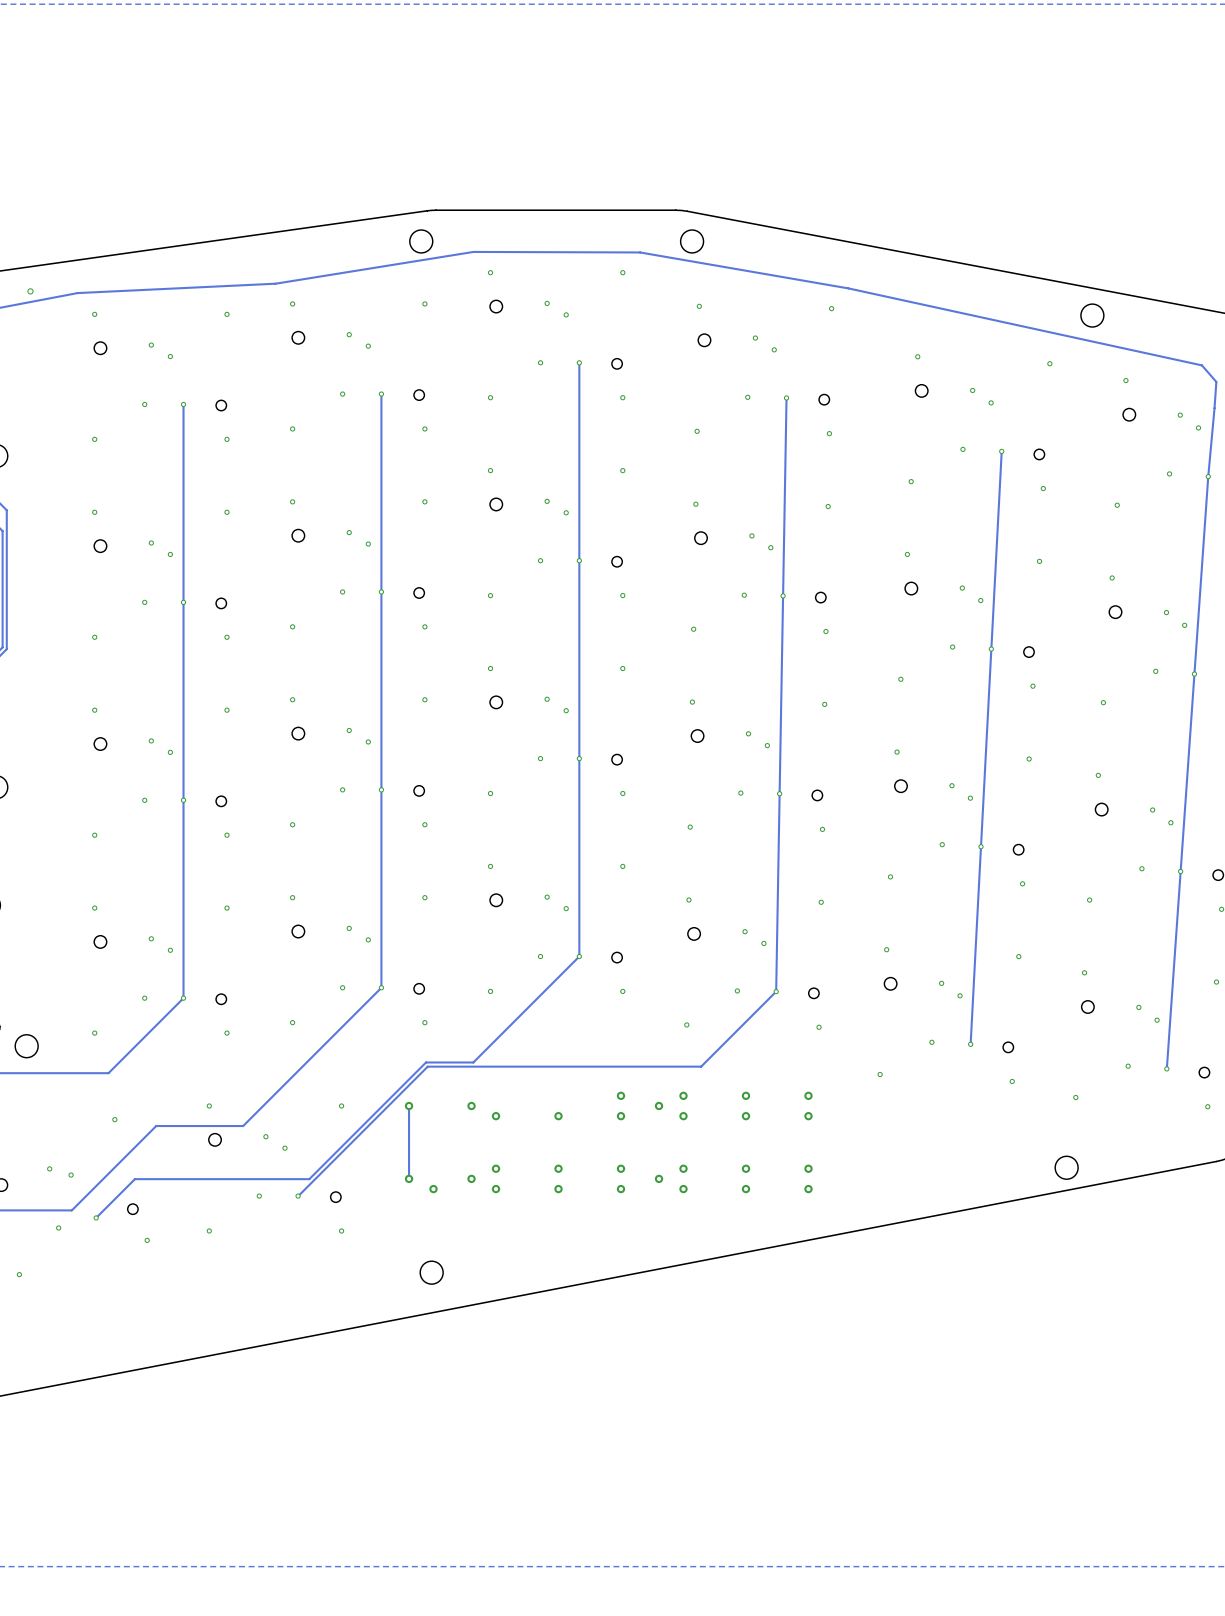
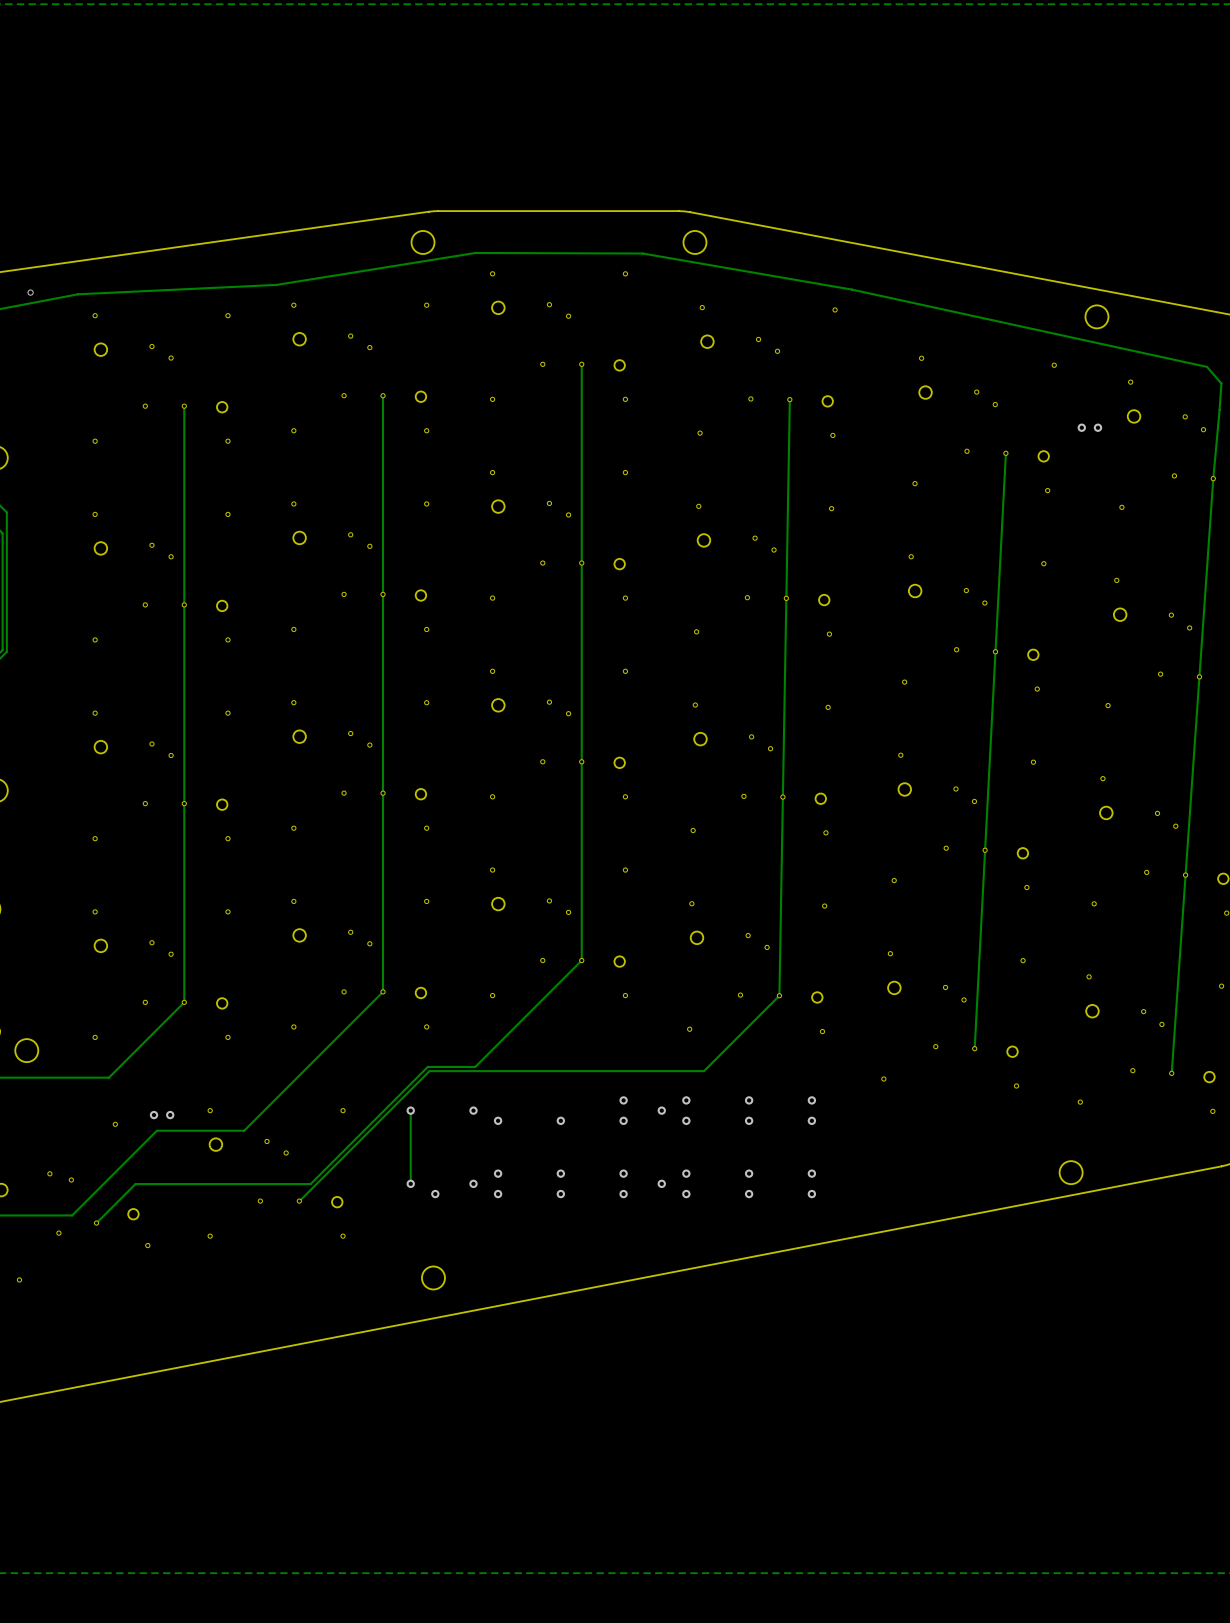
via: none -> (1081, 427)
via: none -> (1098, 427)
via: none -> (154, 1115)
via: none -> (170, 1115)

